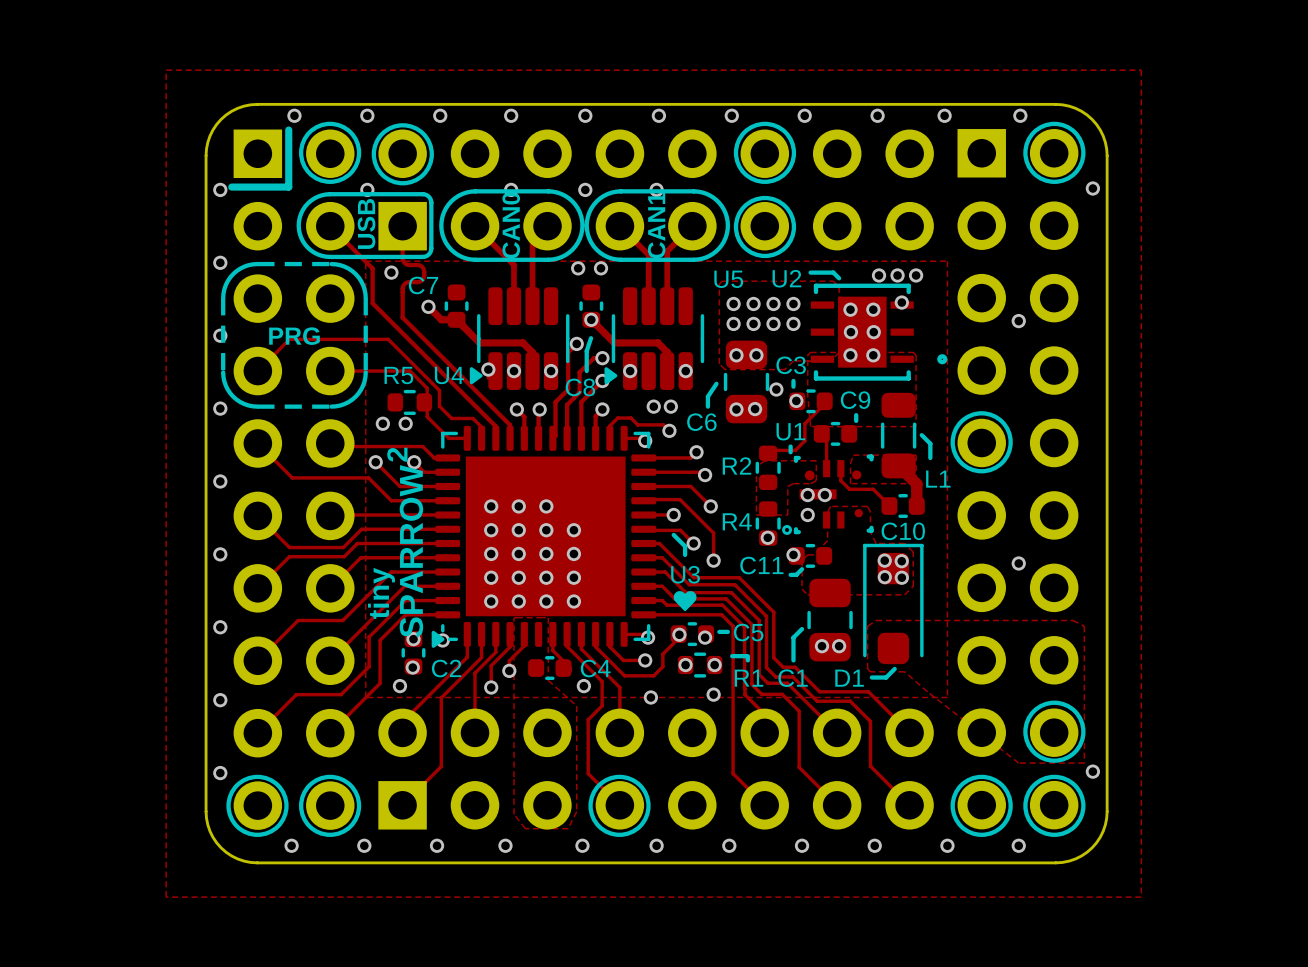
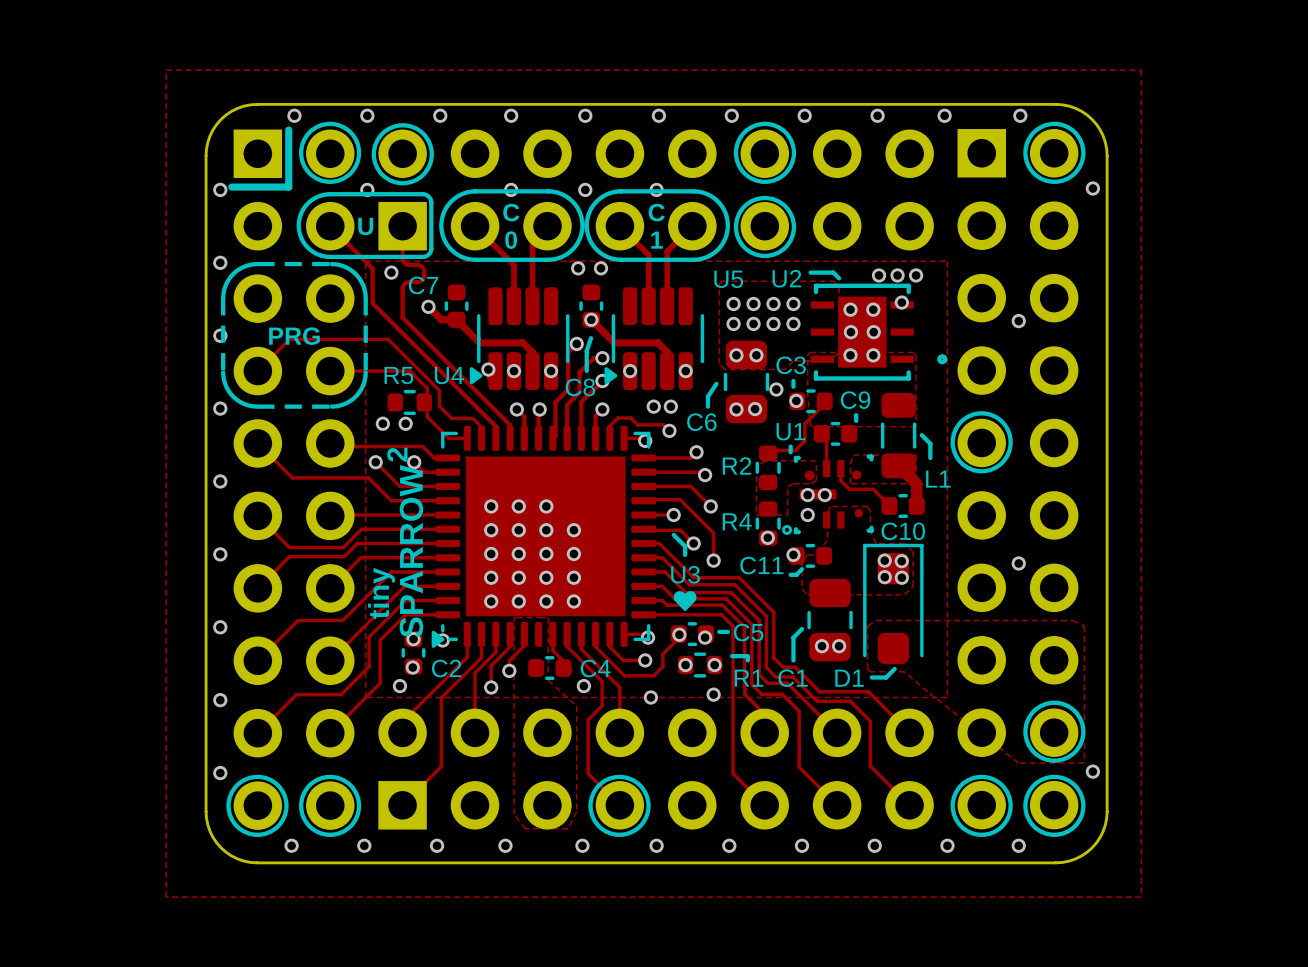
text: none -> C (511, 212)
text: none -> C (656, 212)
text: USB (366, 223) -> U (365, 226)
text: CAN0 (511, 225) -> none
text: CAN1 (656, 225) -> none
text: none -> 0 (511, 240)
text: none -> 1 (657, 240)

